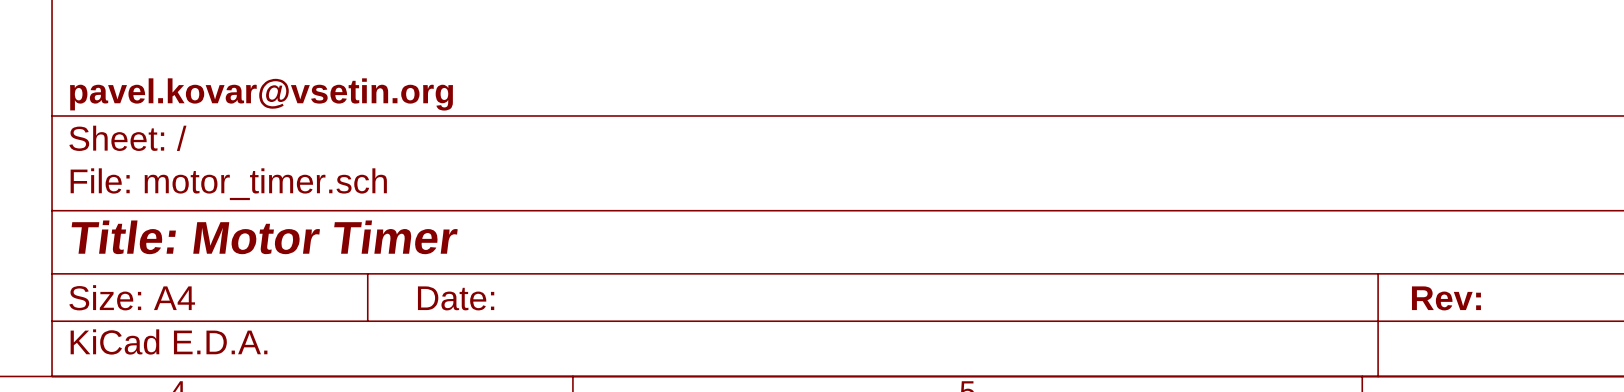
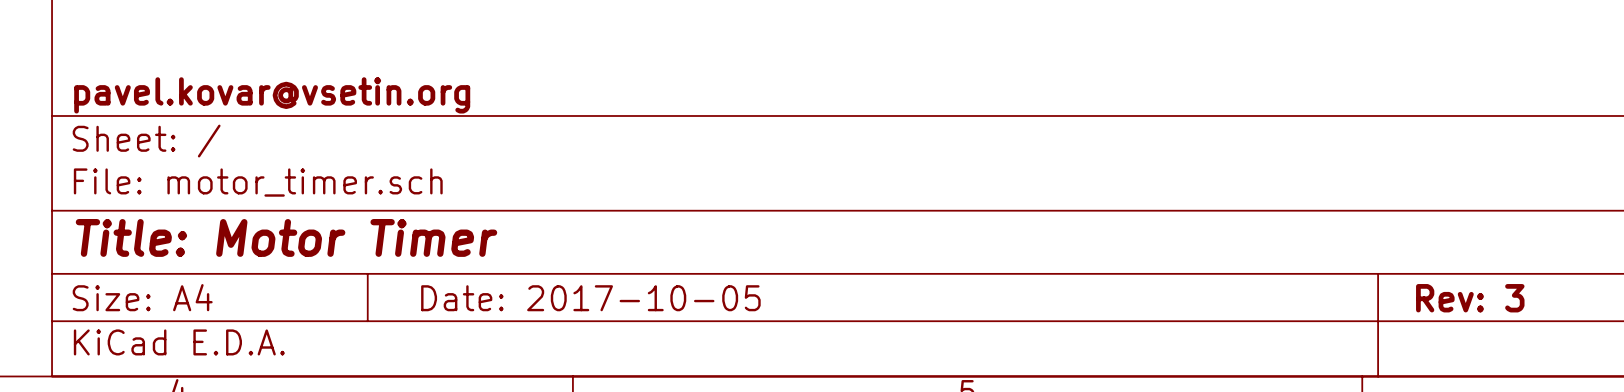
title block: Date: (456, 298) -> Date: 2017-10-05 (590, 298)
title block: Rev: (1446, 298) -> Rev: 3 (1470, 298)

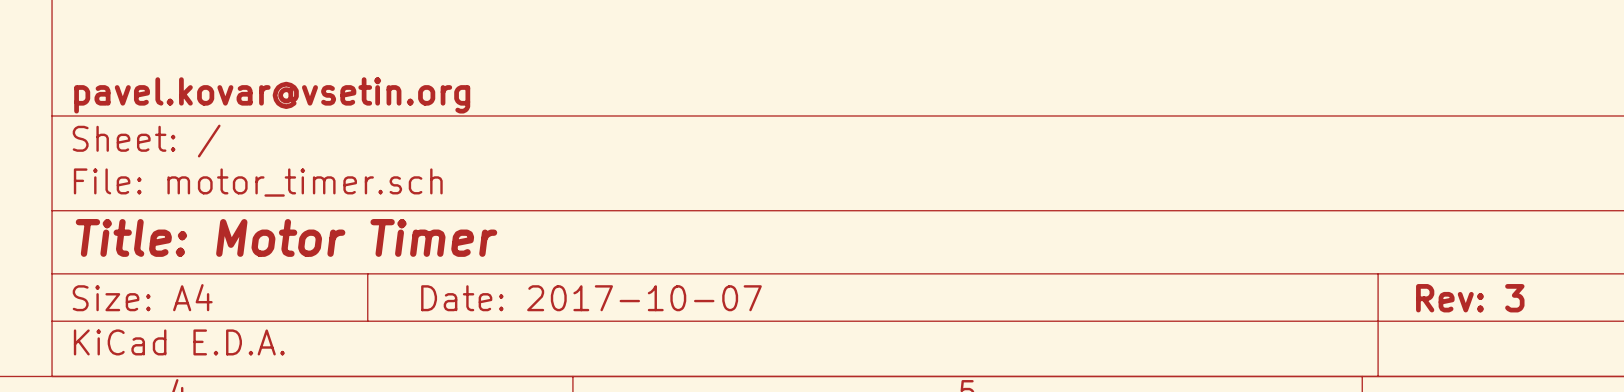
title block: Date: 2017-10-05 (590, 298) -> Date: 2017-10-07 (591, 298)

